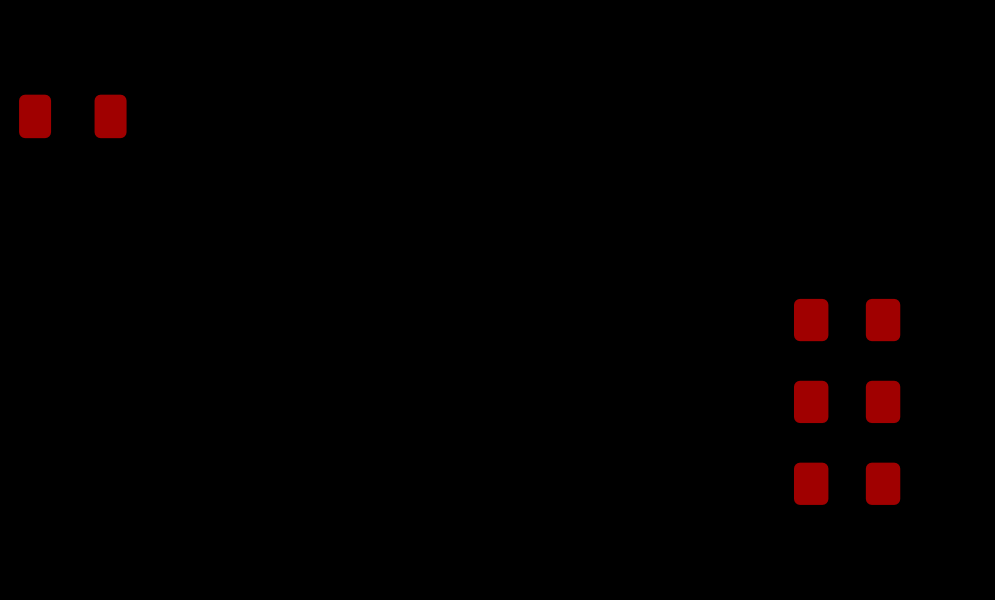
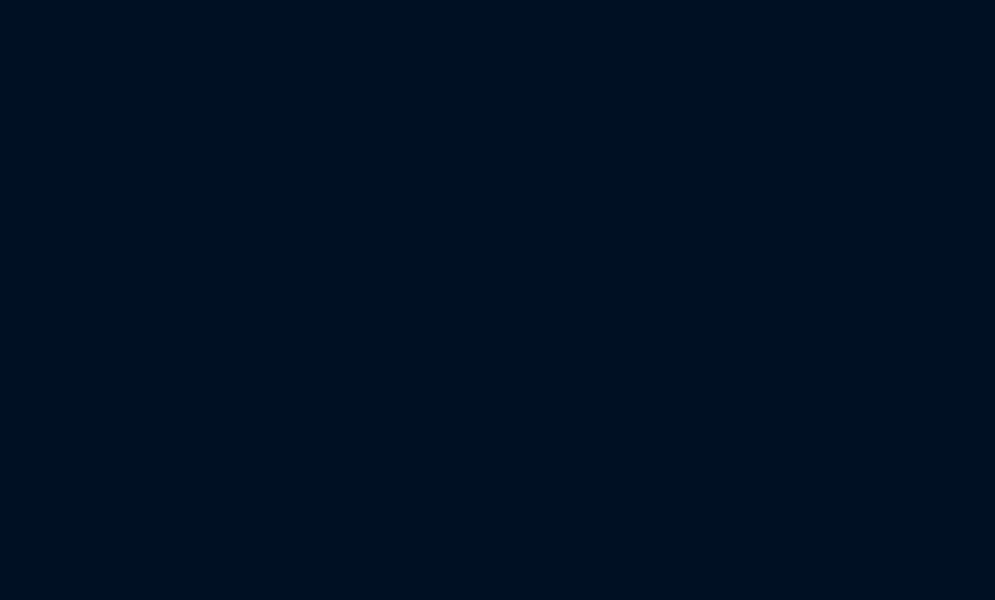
part: (72, 116) -> none
part: (847, 320) -> none
part: (847, 401) -> none
part: (847, 483) -> none

